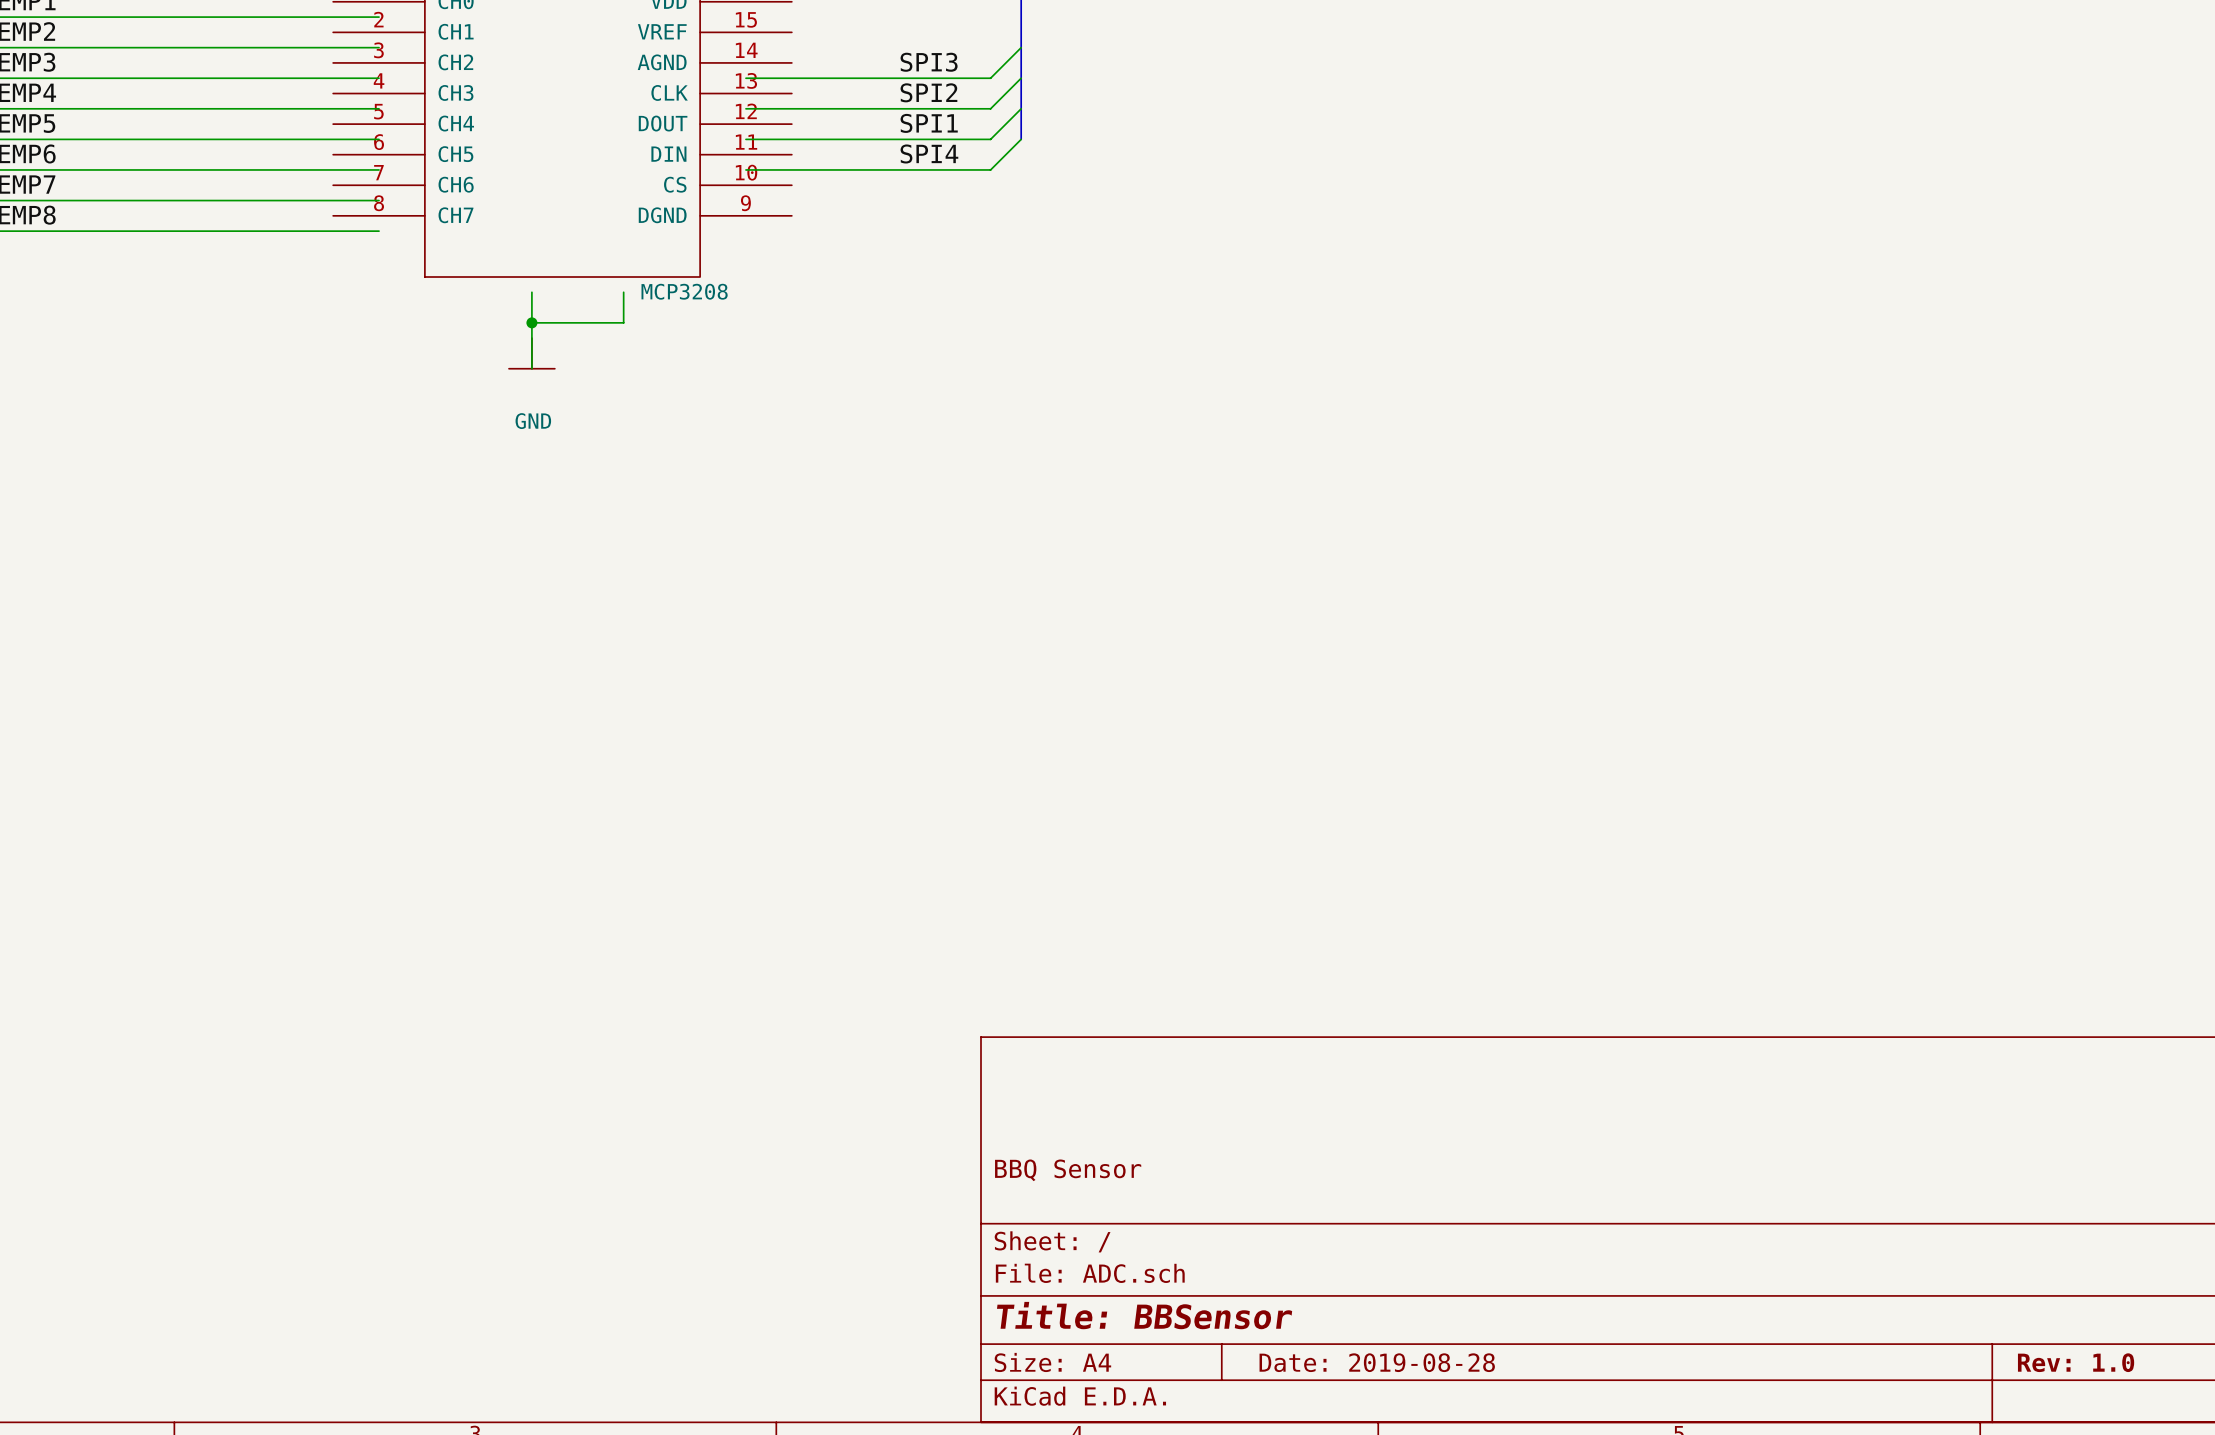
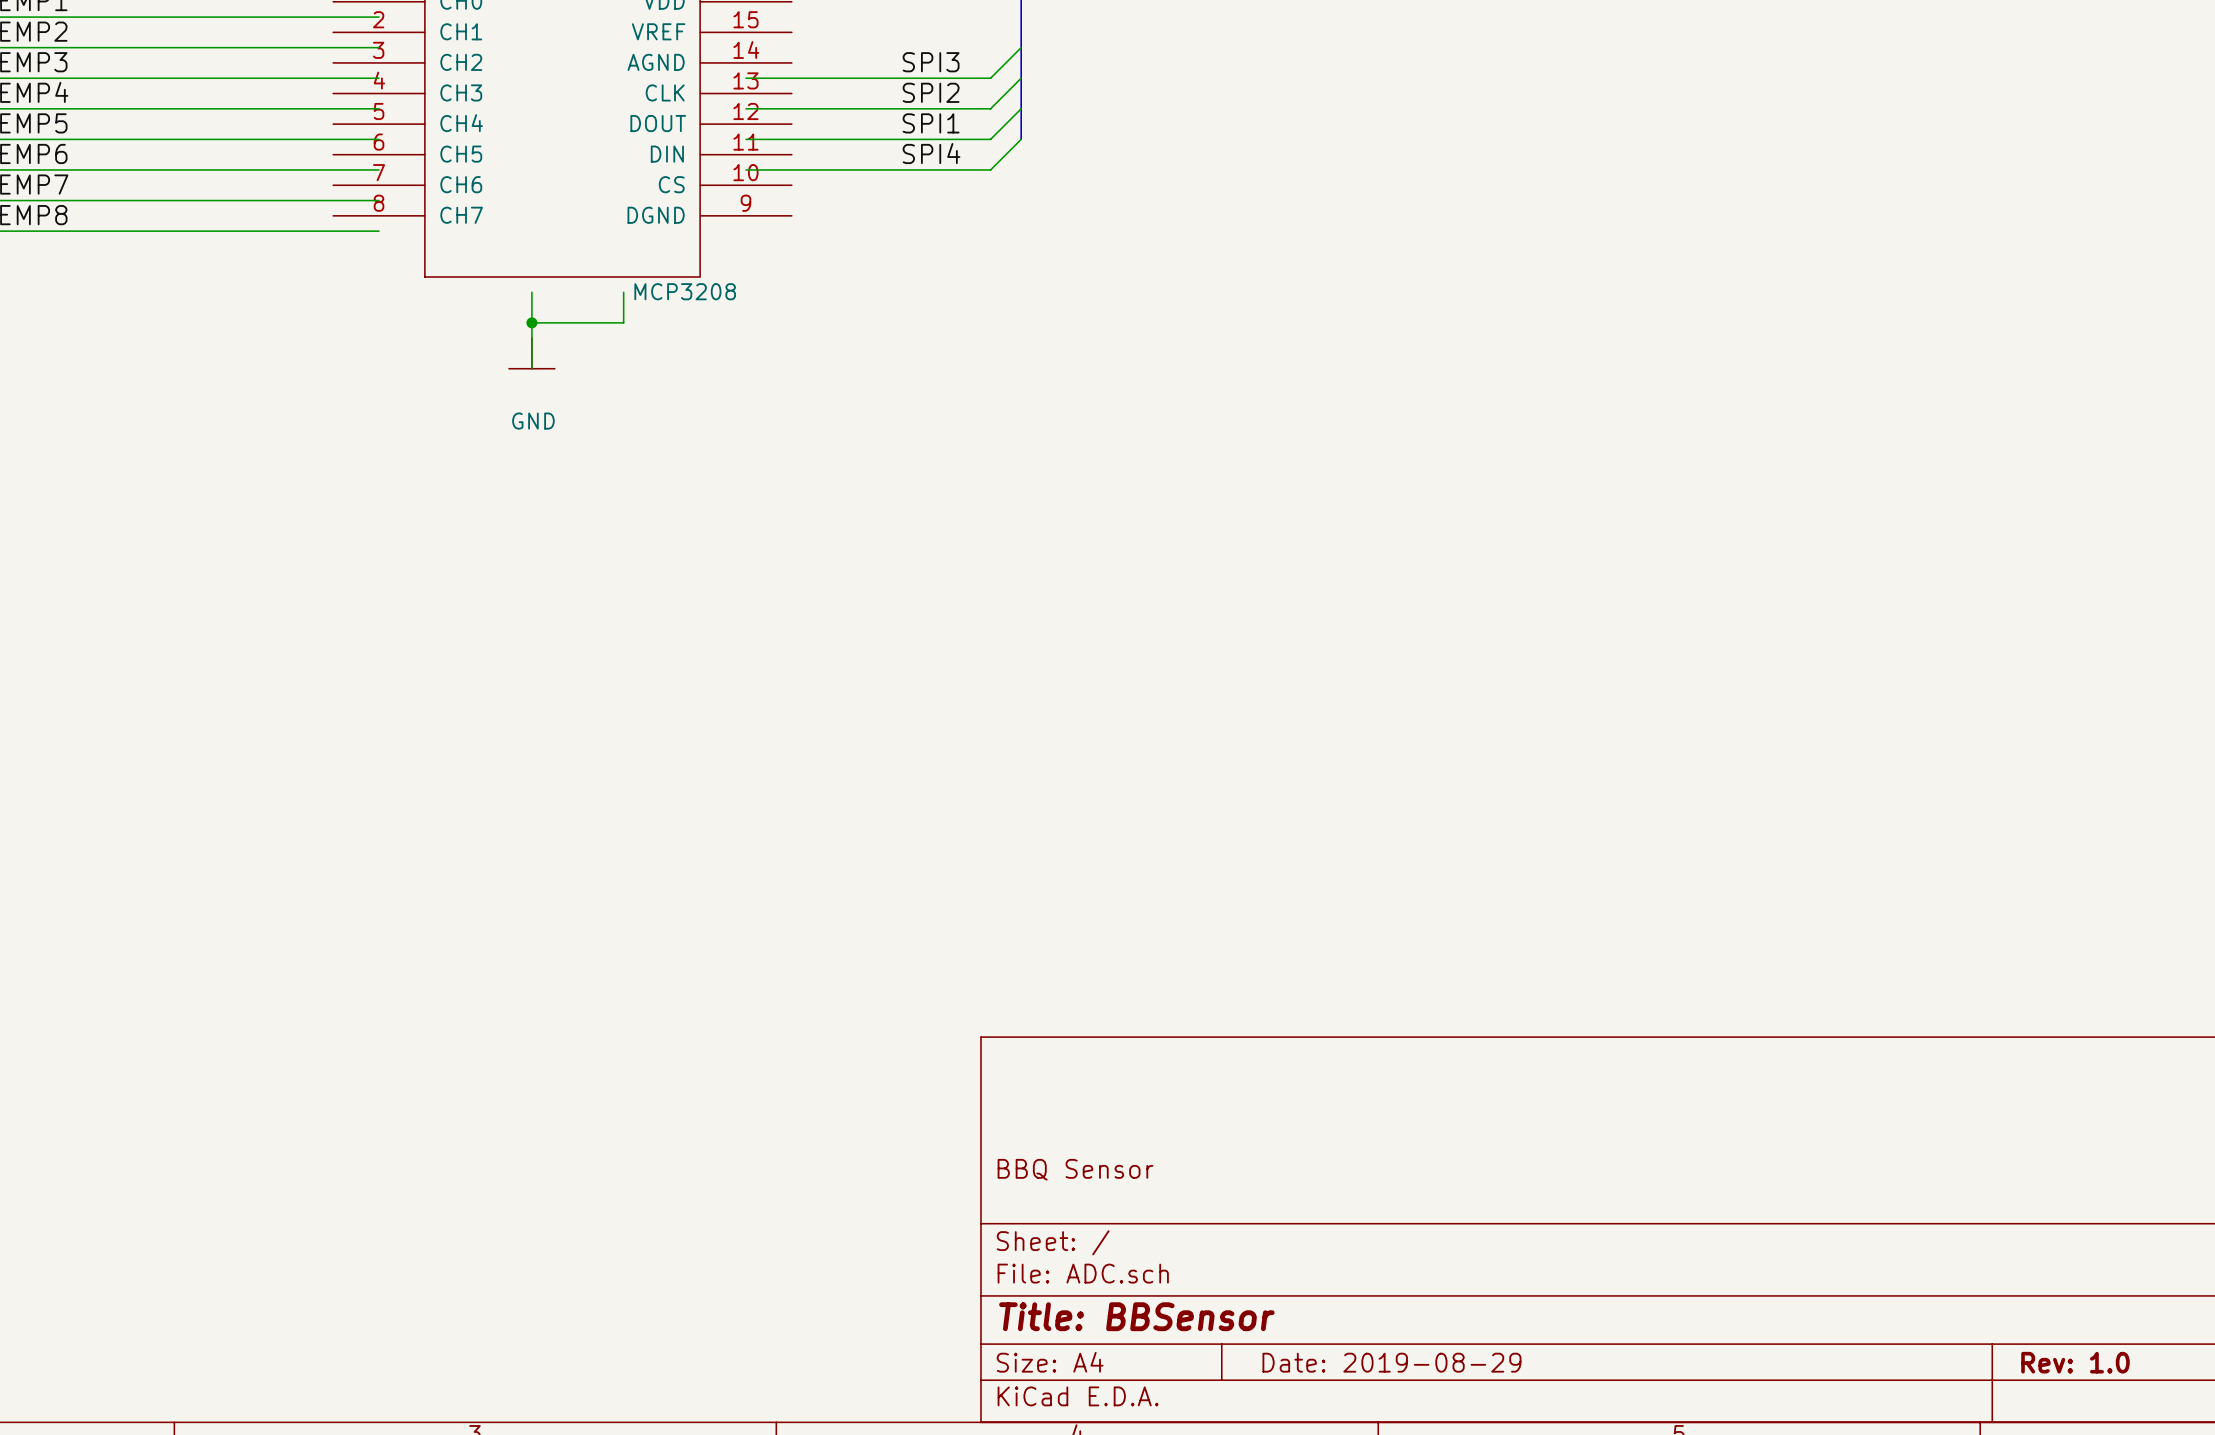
title block: Date: 2019-08-28 (1377, 1362) -> Date: 2019-08-29 (1391, 1362)

